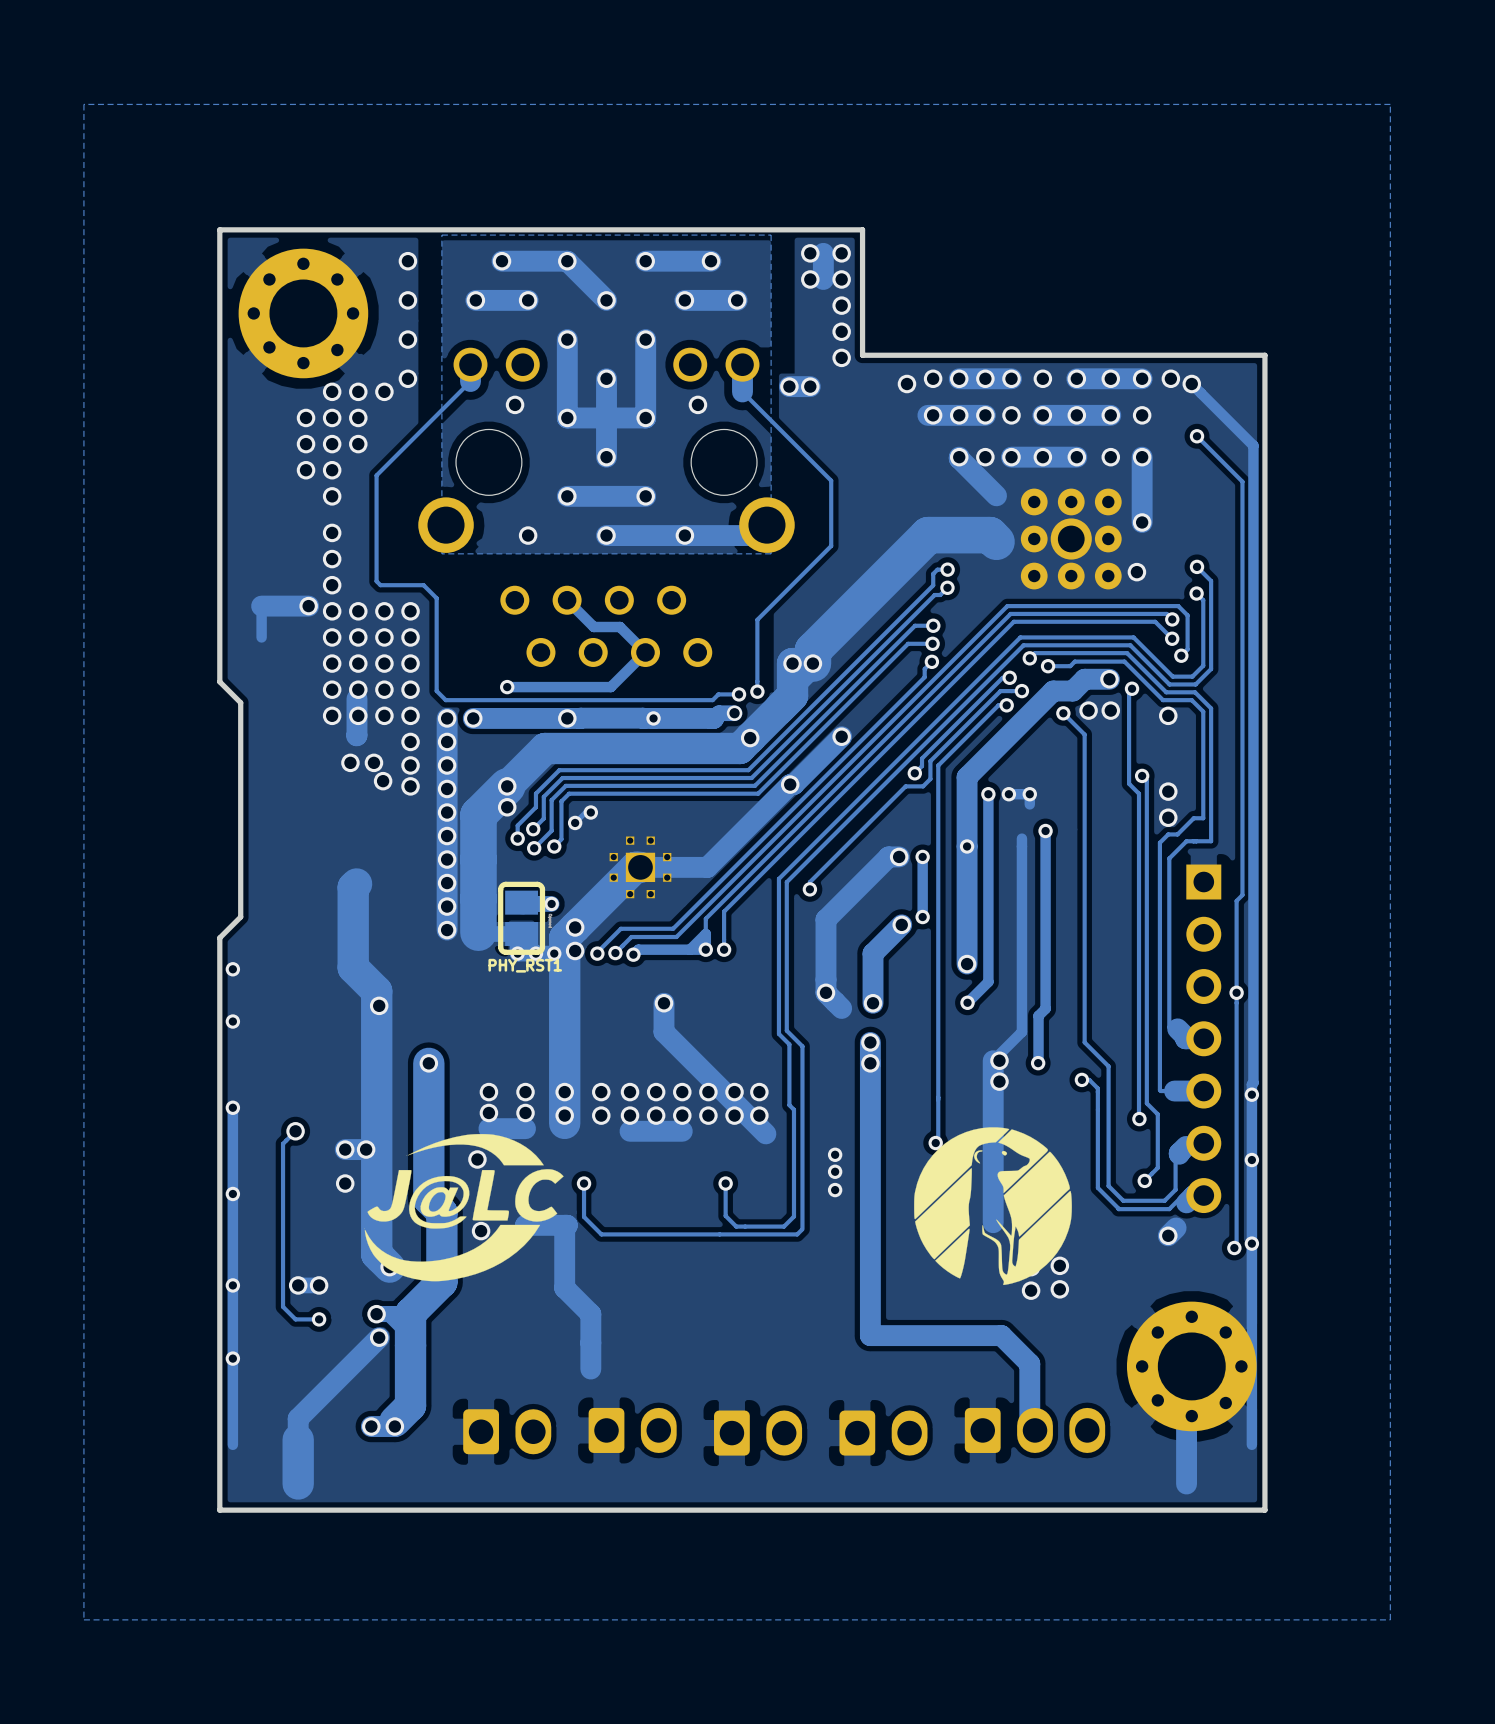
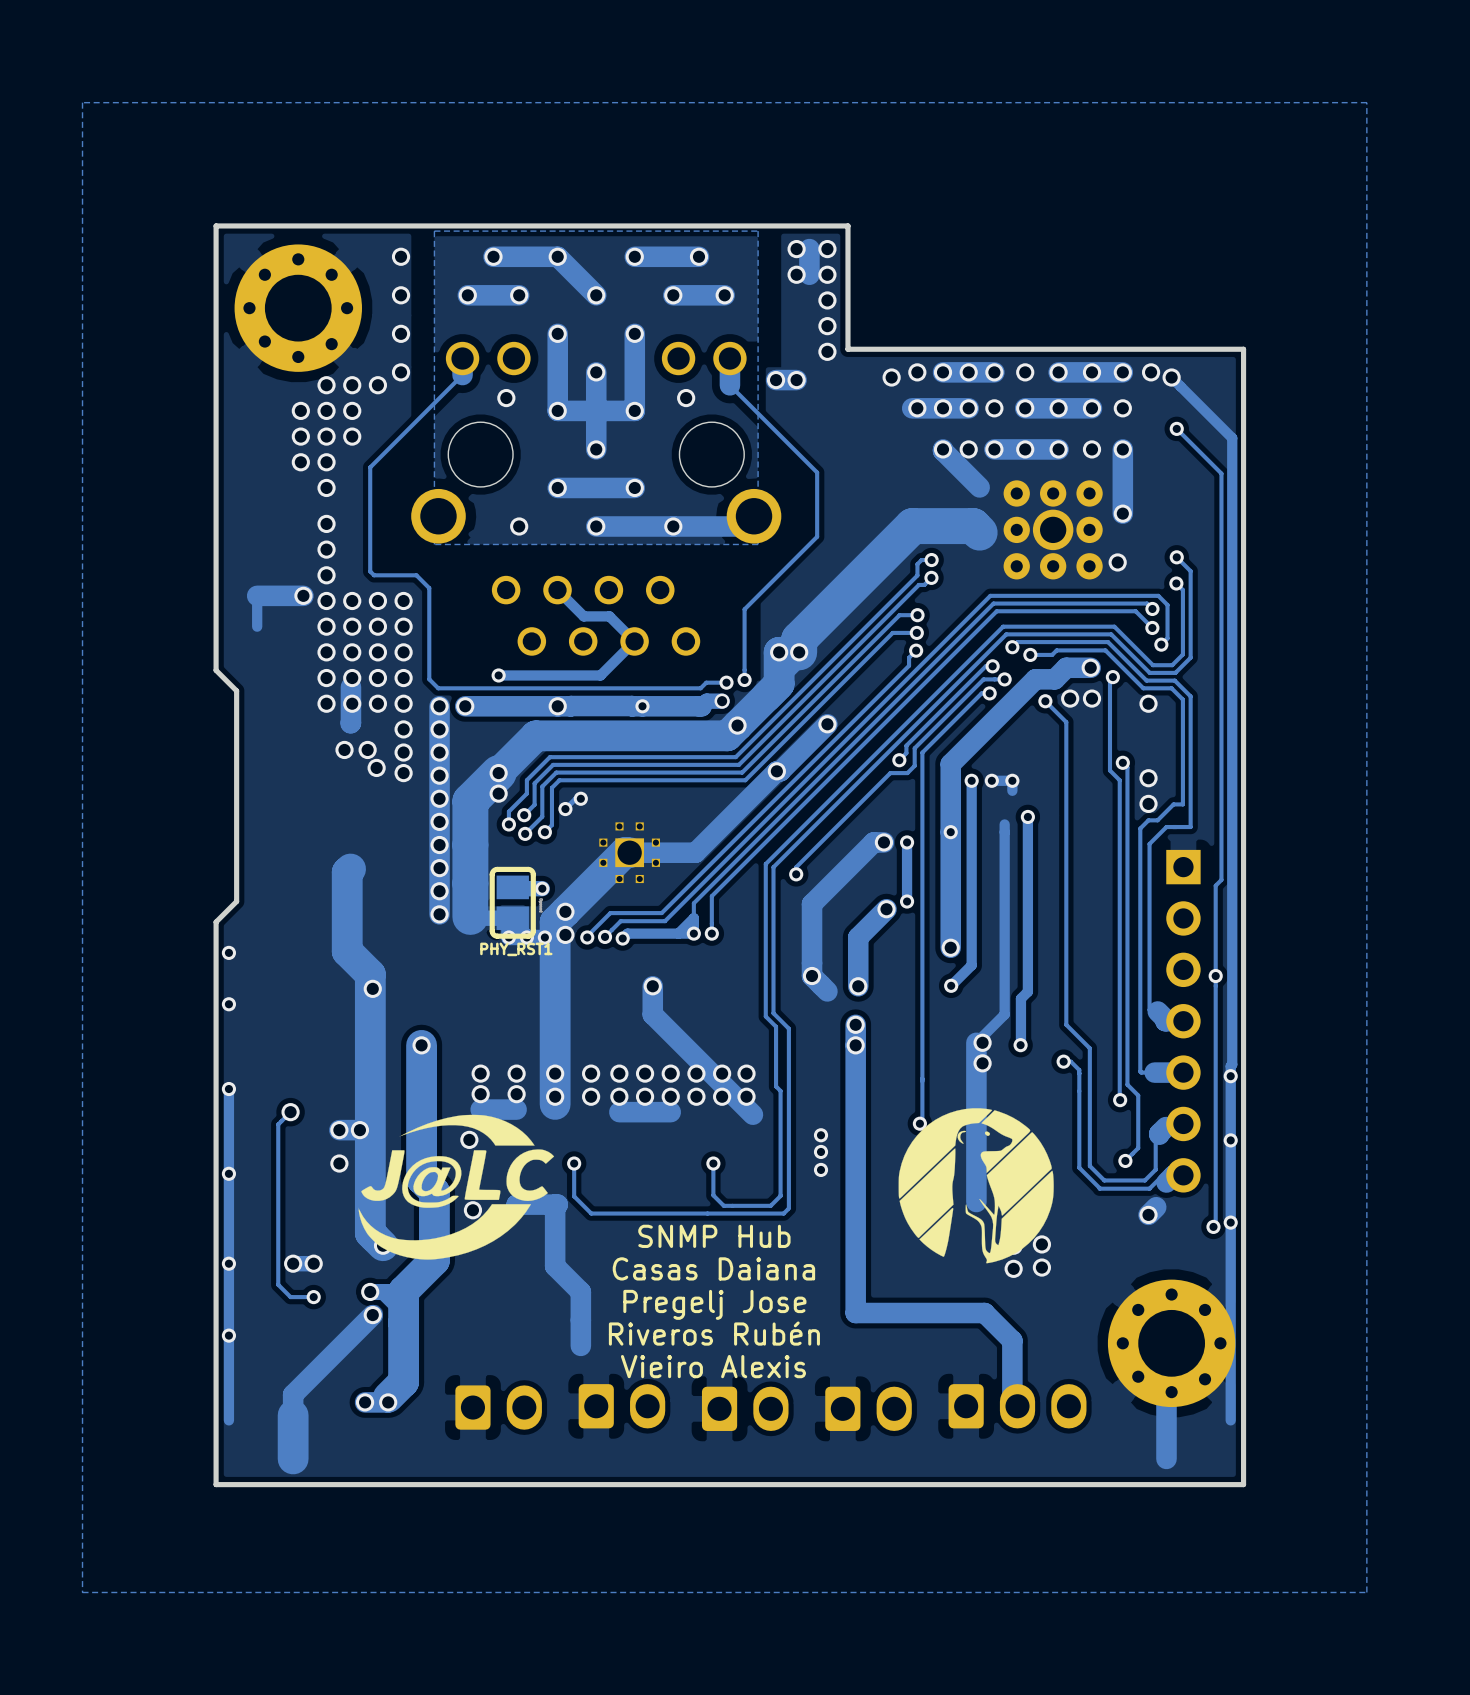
text: none -> SNMP Hub (714, 1236)
text: none -> Casas Daiana (713, 1268)
text: none -> Pregelj Jose (714, 1304)
text: none -> Riveros Rubén (714, 1333)
text: none -> Vieiro Alexis (713, 1366)

